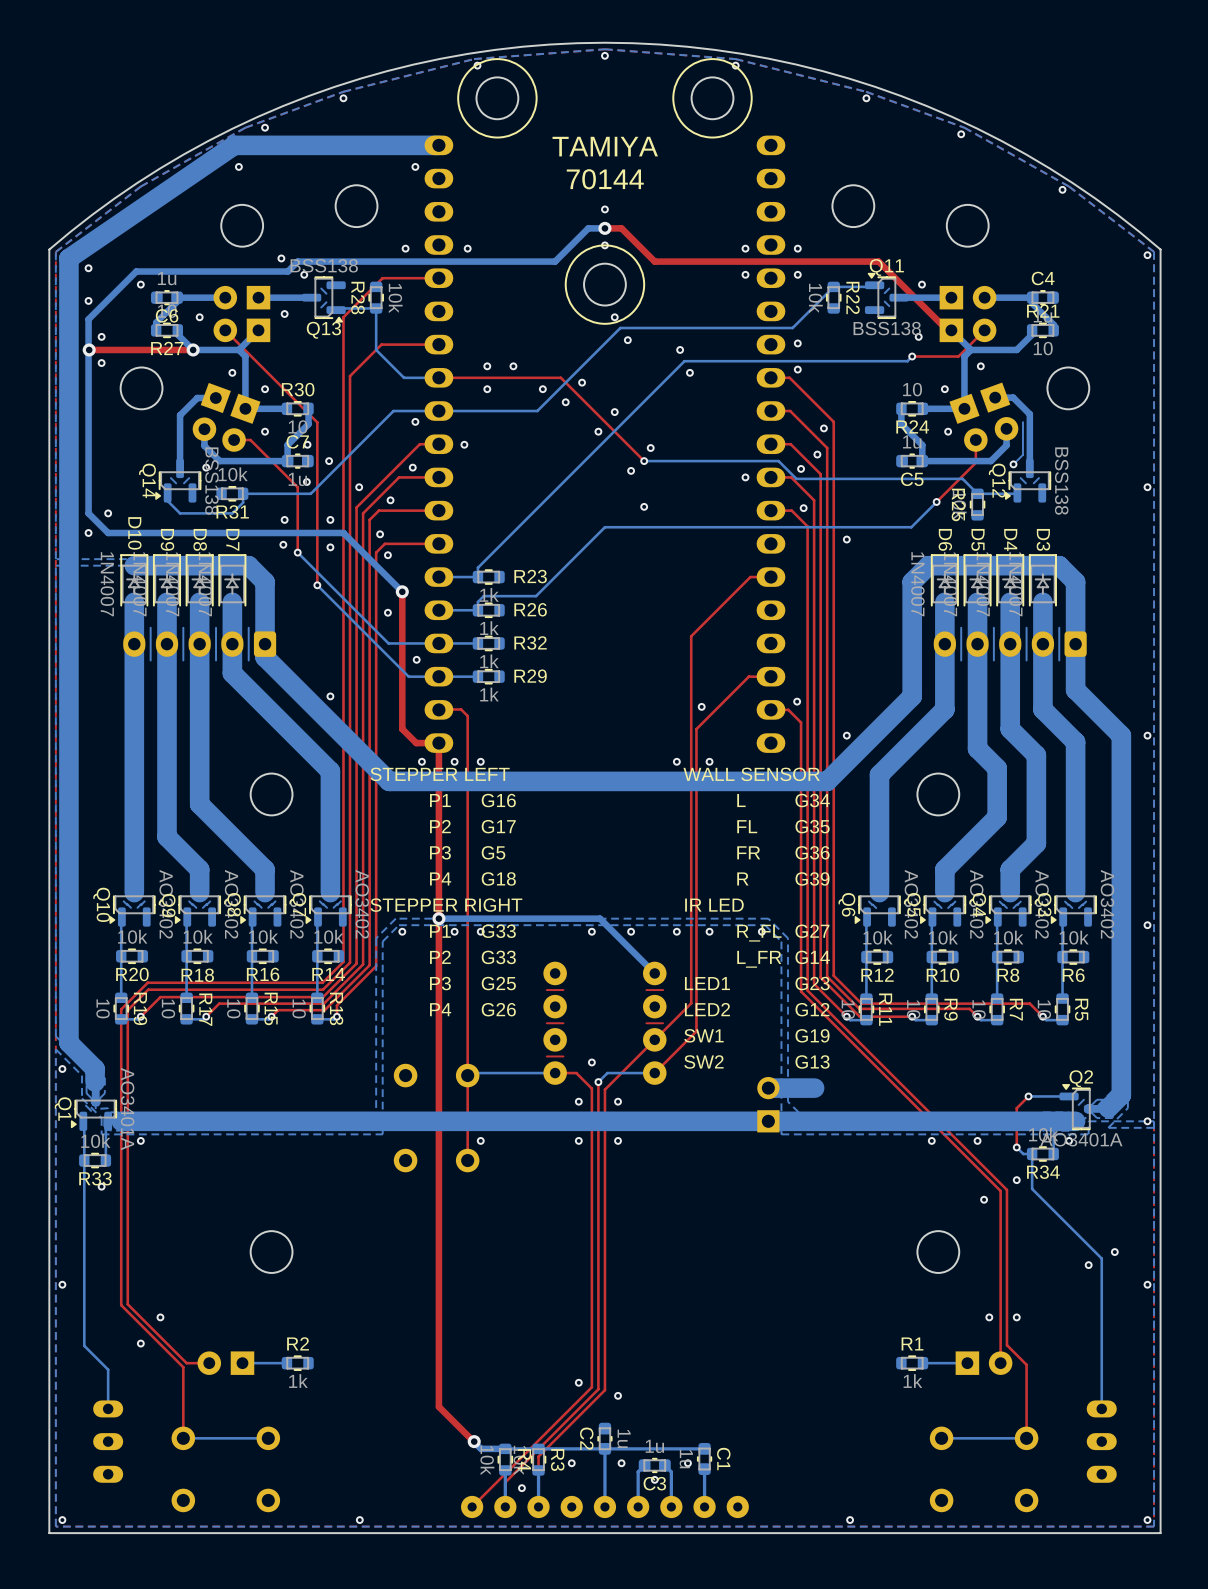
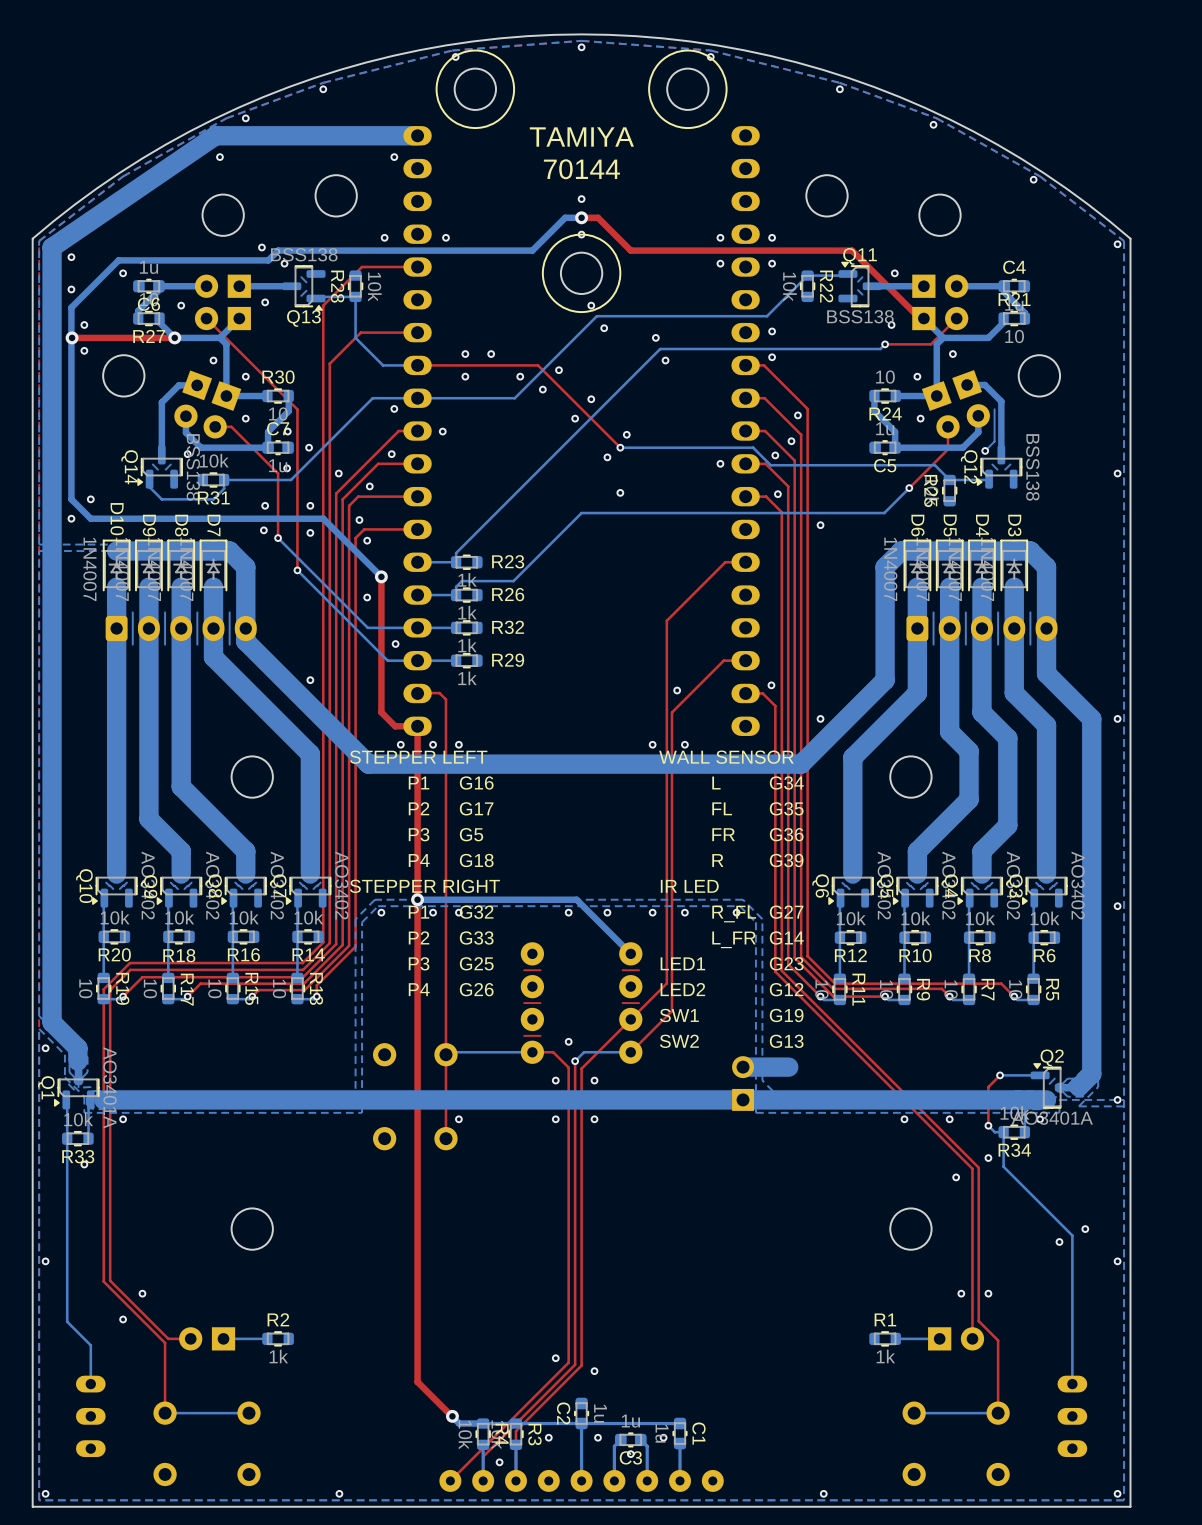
part rotation: 0° (199, 644) -> 180° (181, 628)
part rotation: 0° (1010, 644) -> 180° (981, 628)
text: G33 (498, 931) -> G32 (476, 912)

